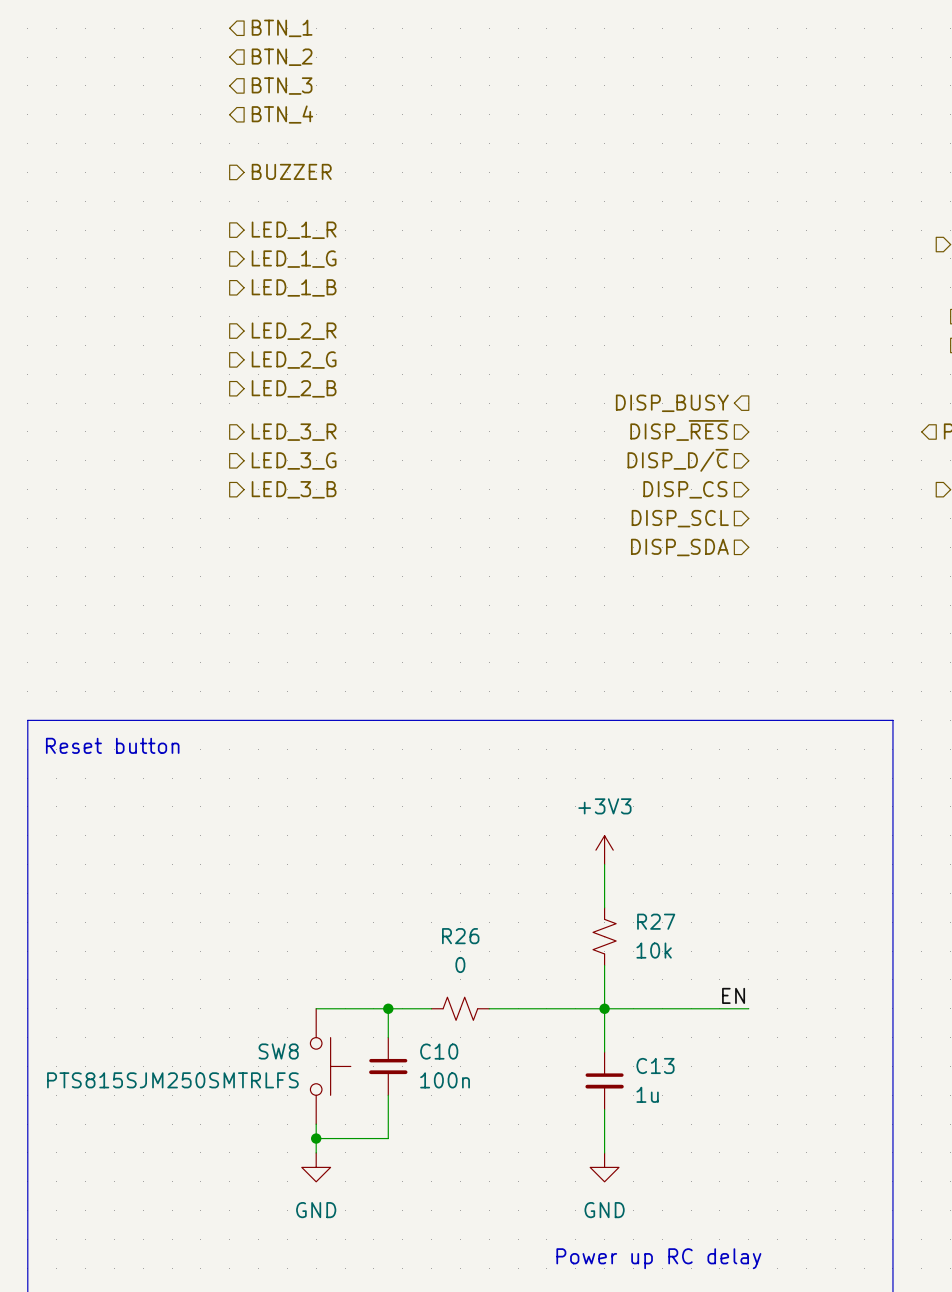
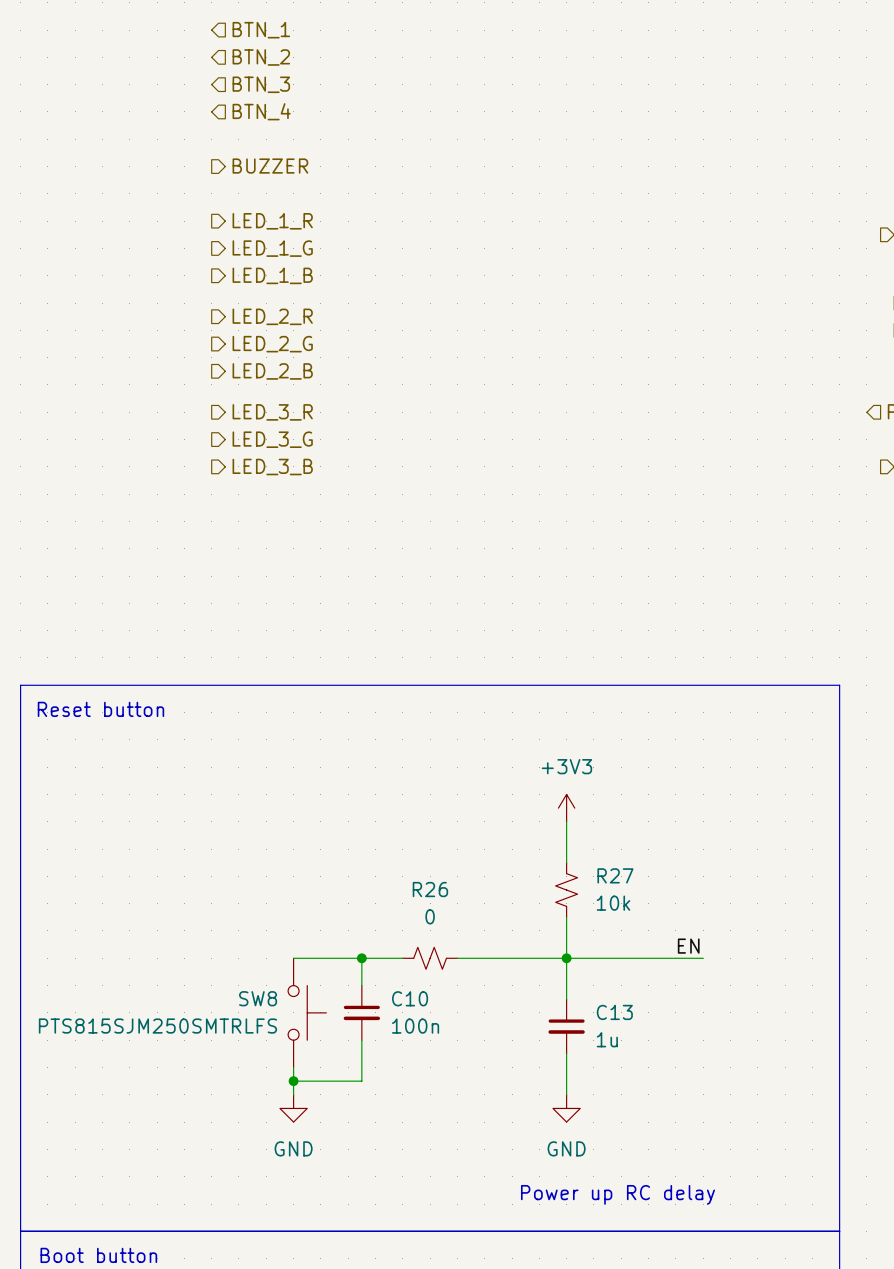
hierarchical label: DISP_BUSY (672, 403) -> none
hierarchical label: DISP_~{RES} (679, 430) -> none
hierarchical label: DISP_D/~{C} (678, 460) -> none
hierarchical label: DISP_CS (685, 489) -> none
hierarchical label: DISP_SCL (680, 518) -> none
hierarchical label: DISP_SDA (679, 547) -> none

